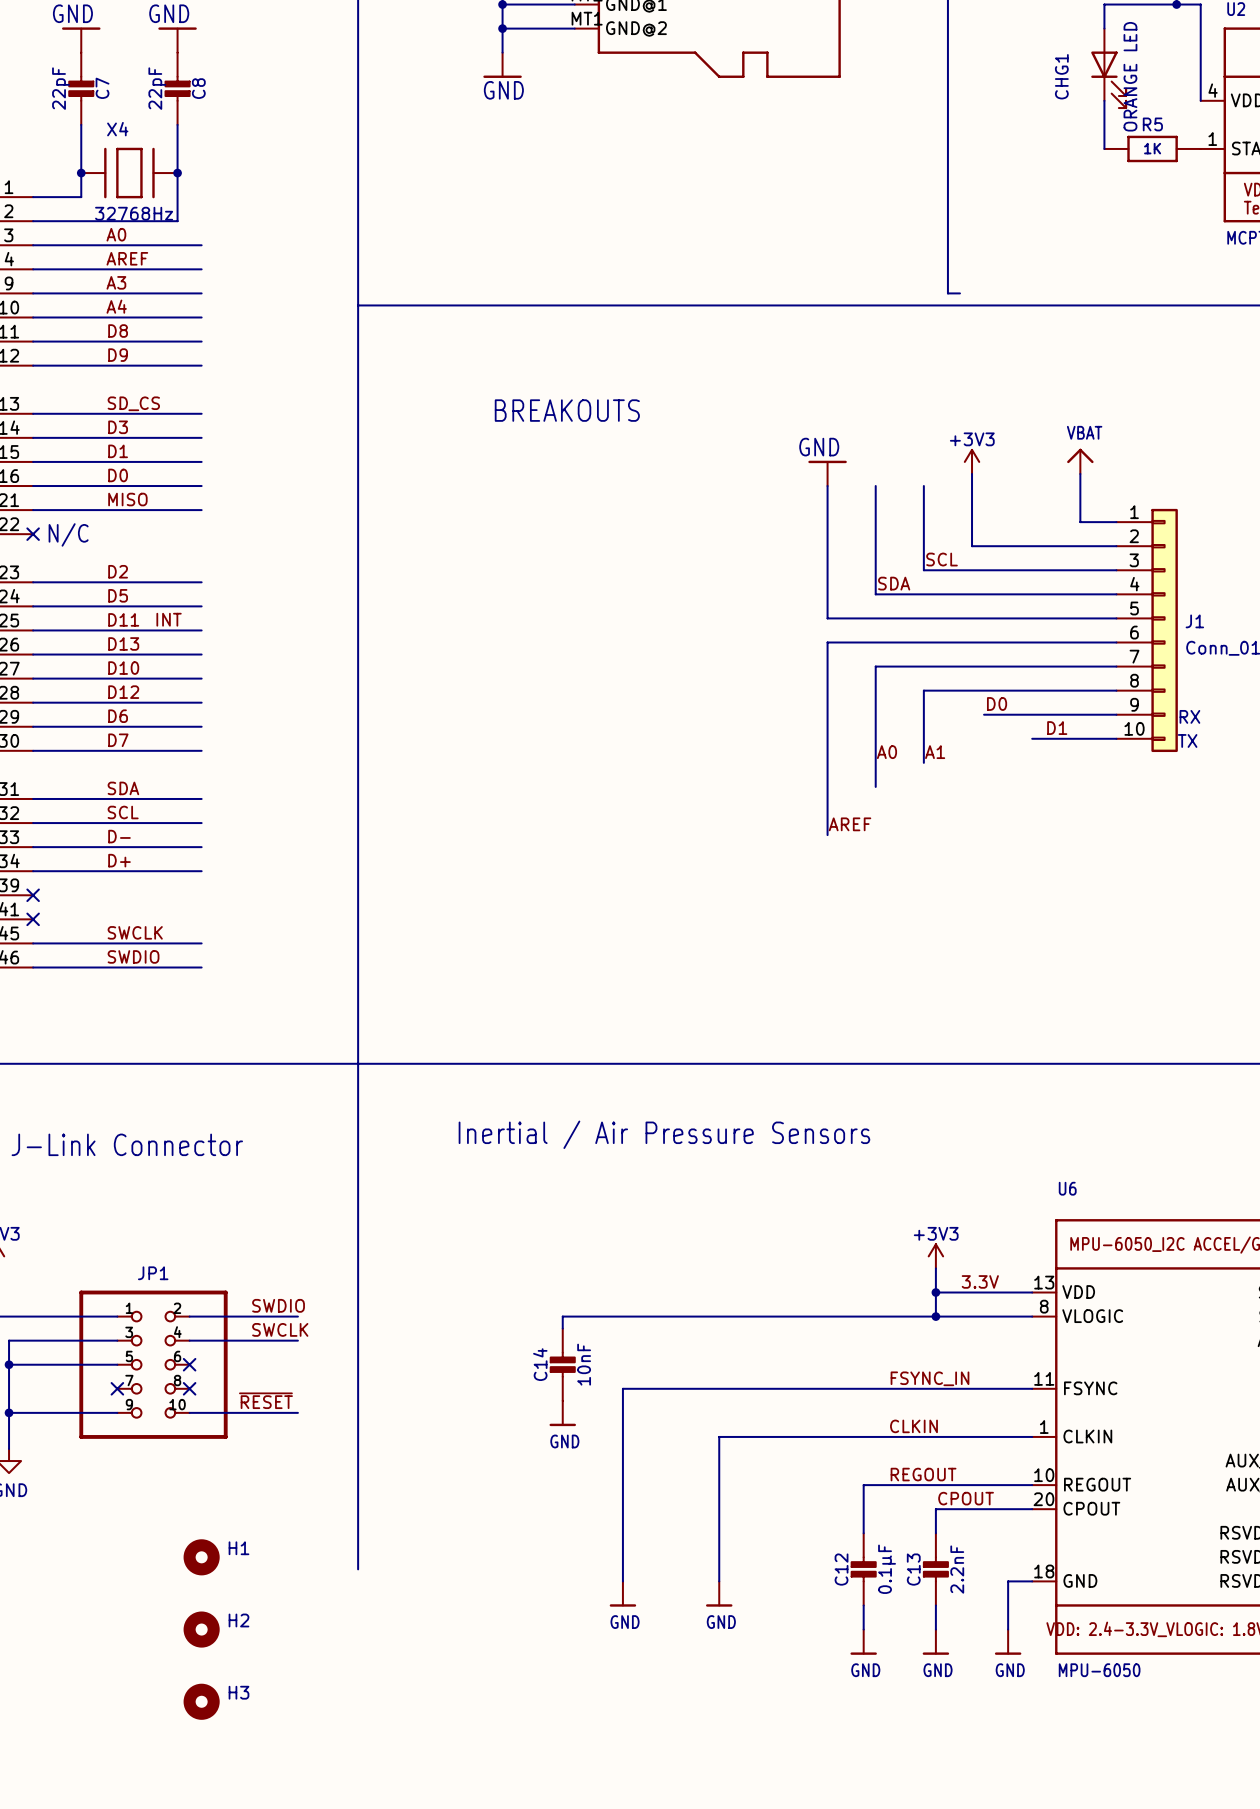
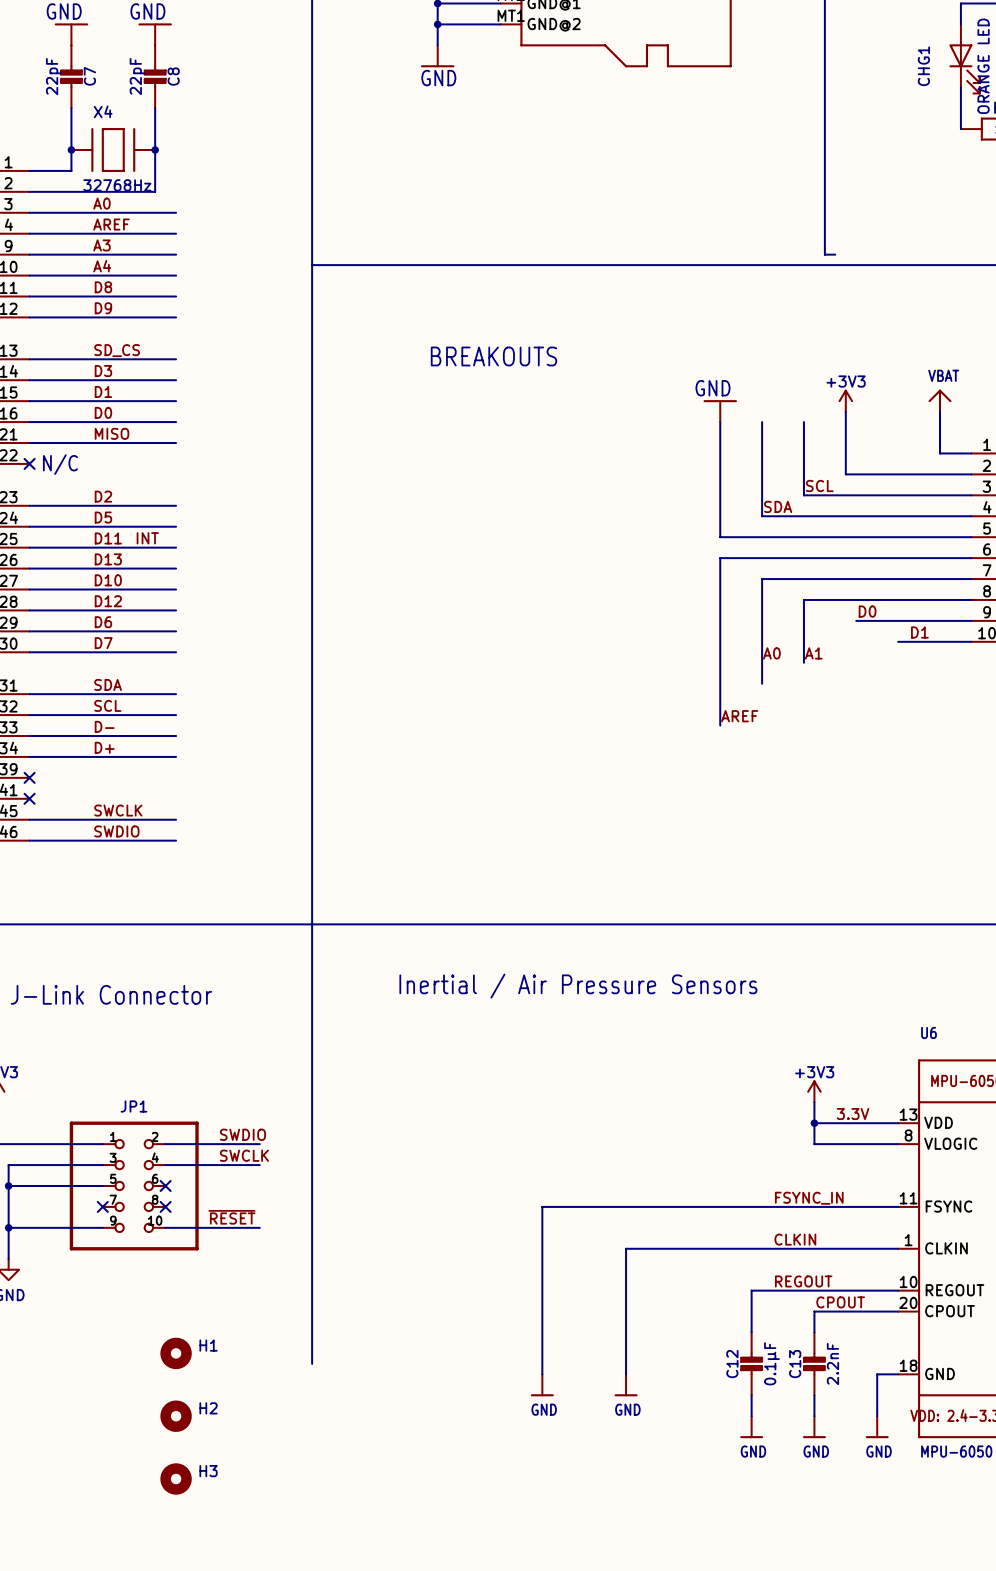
wire: (935, 1316) (562, 1316) (562, 1328) -> none
junction: (935, 1316) -> none
C14: 10nF (562, 1364) -> none
power symbol: GND (562, 1413) -> none

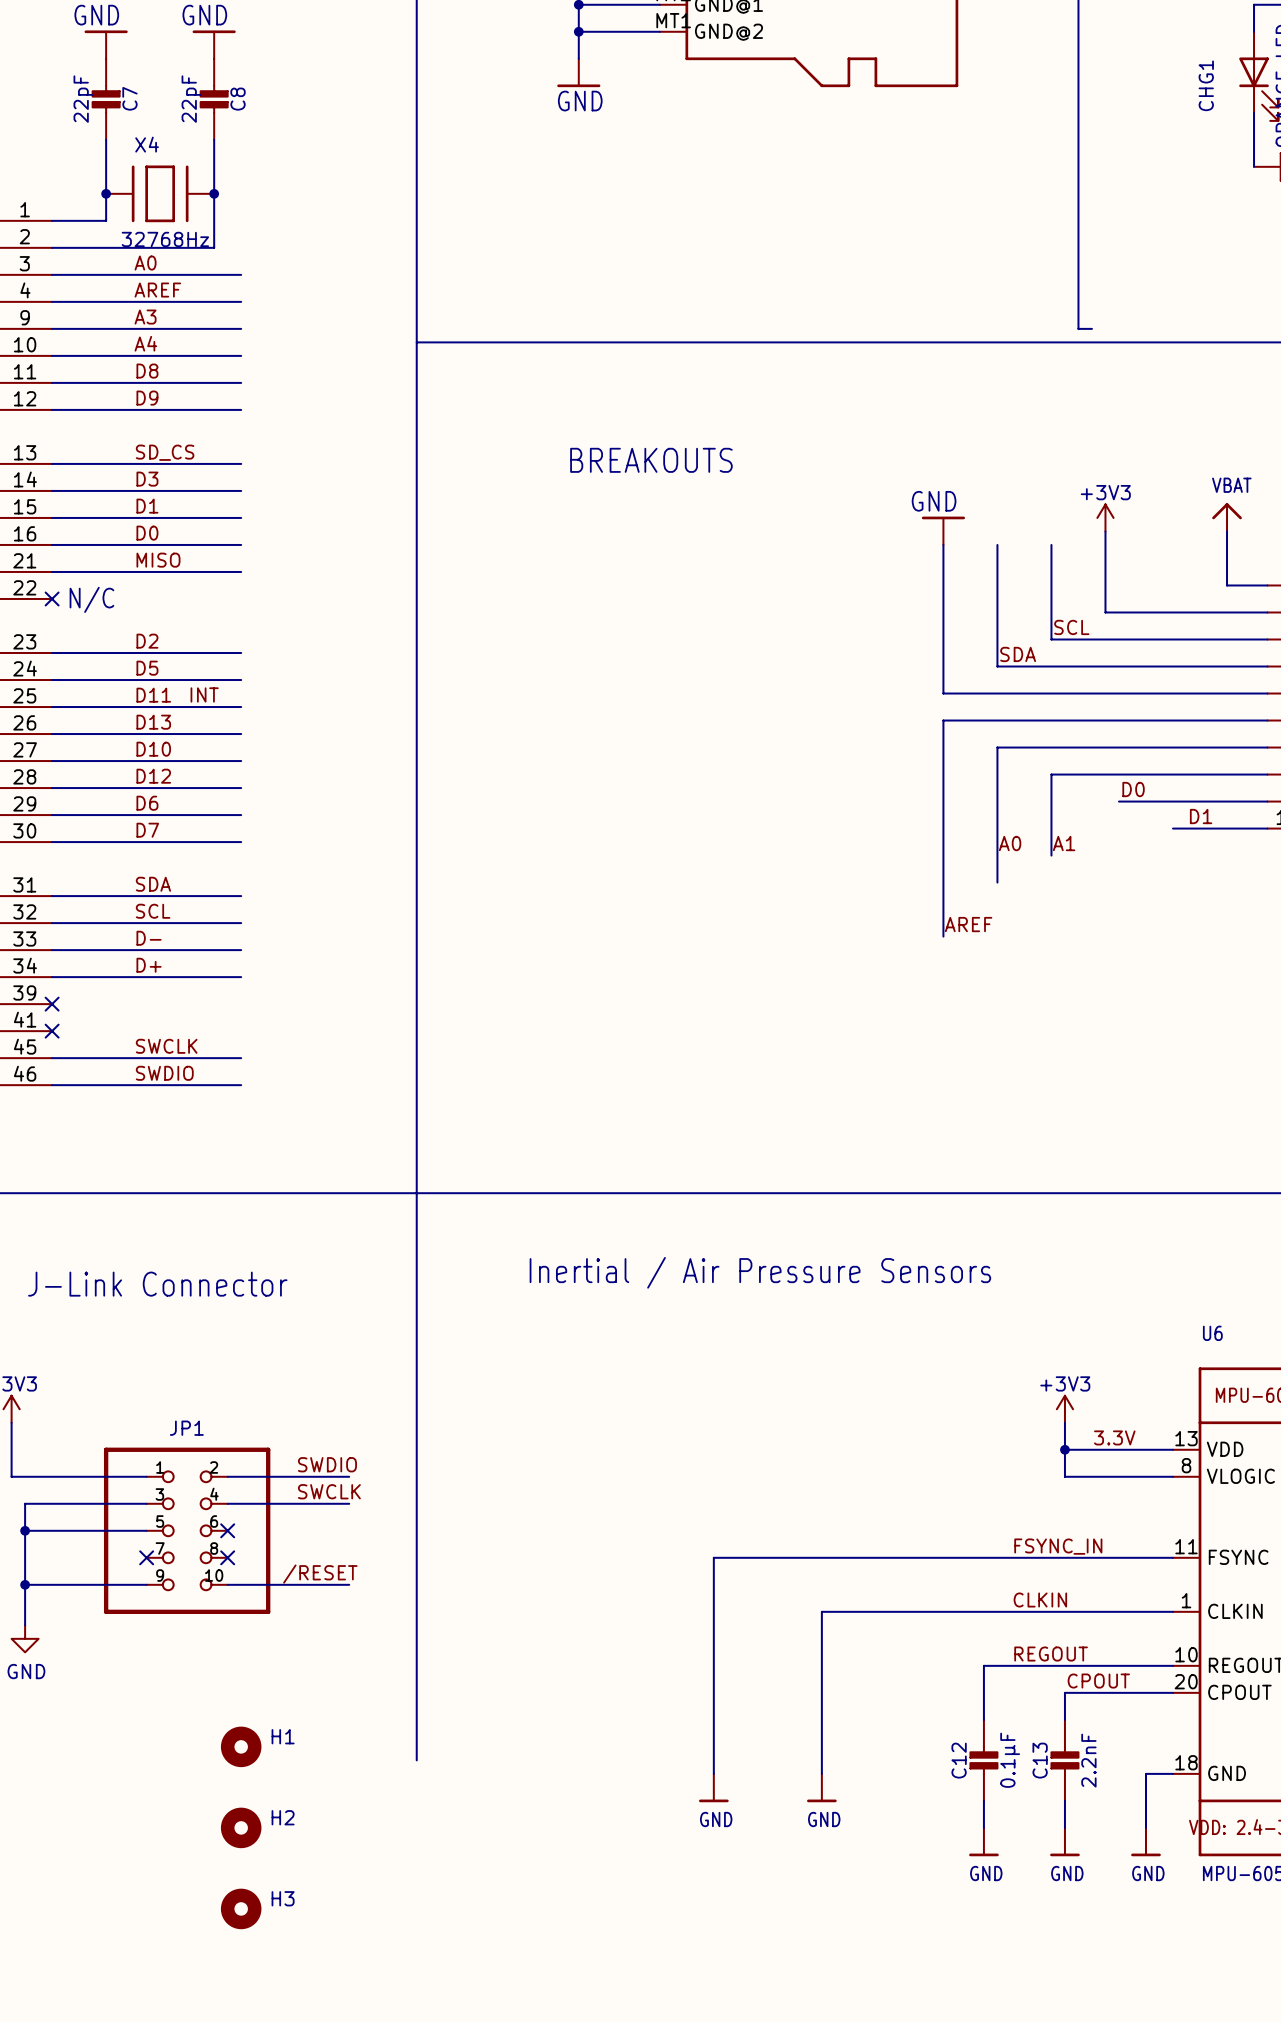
label: ~{RESET} (231, 1217) -> /RESET (320, 1574)

